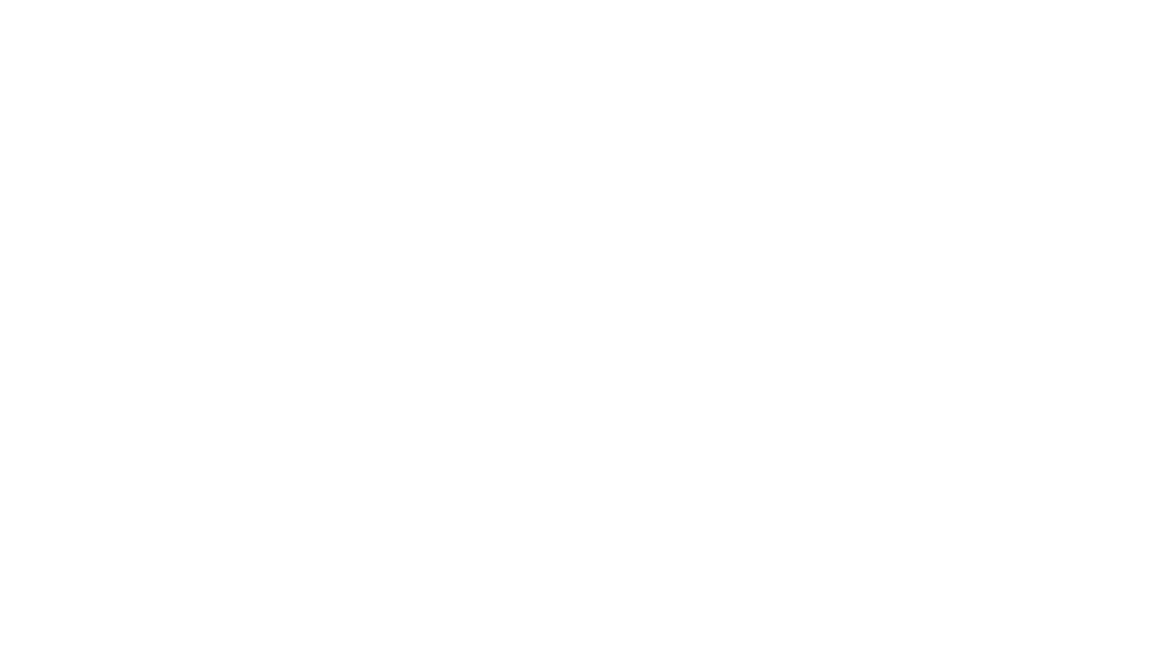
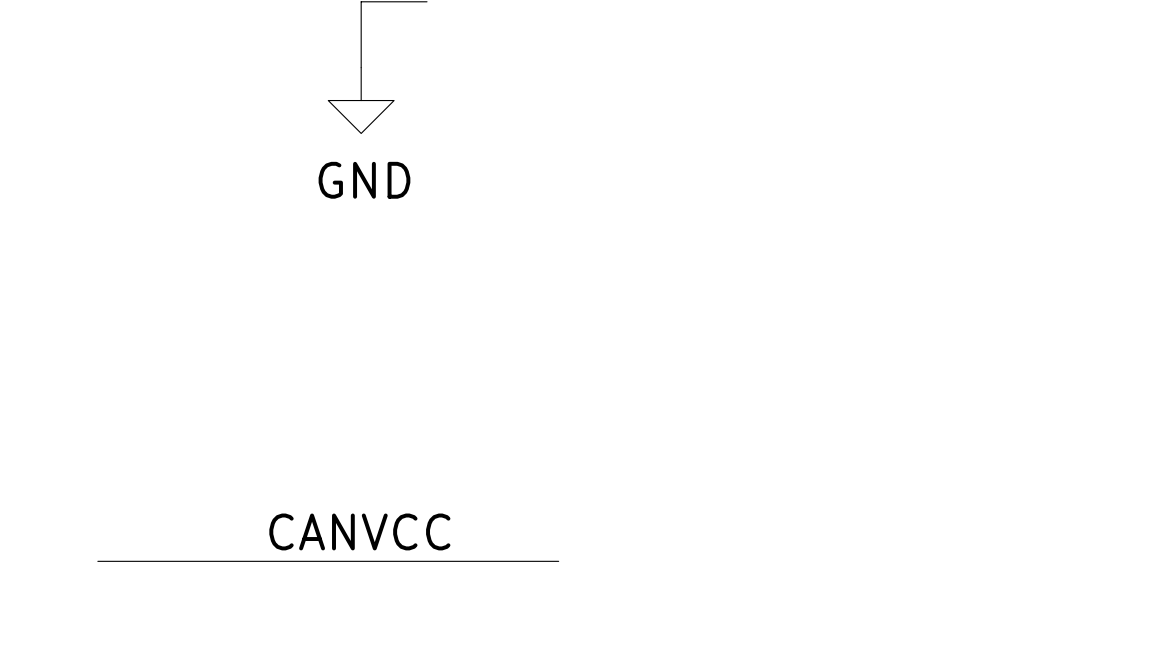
wire: none -> (427, 1) (361, 1) (361, 67)
power symbol: none -> GND (361, 100)
label: none -> CANVCC (359, 531)
wire: none -> (97, 561) (558, 561)

